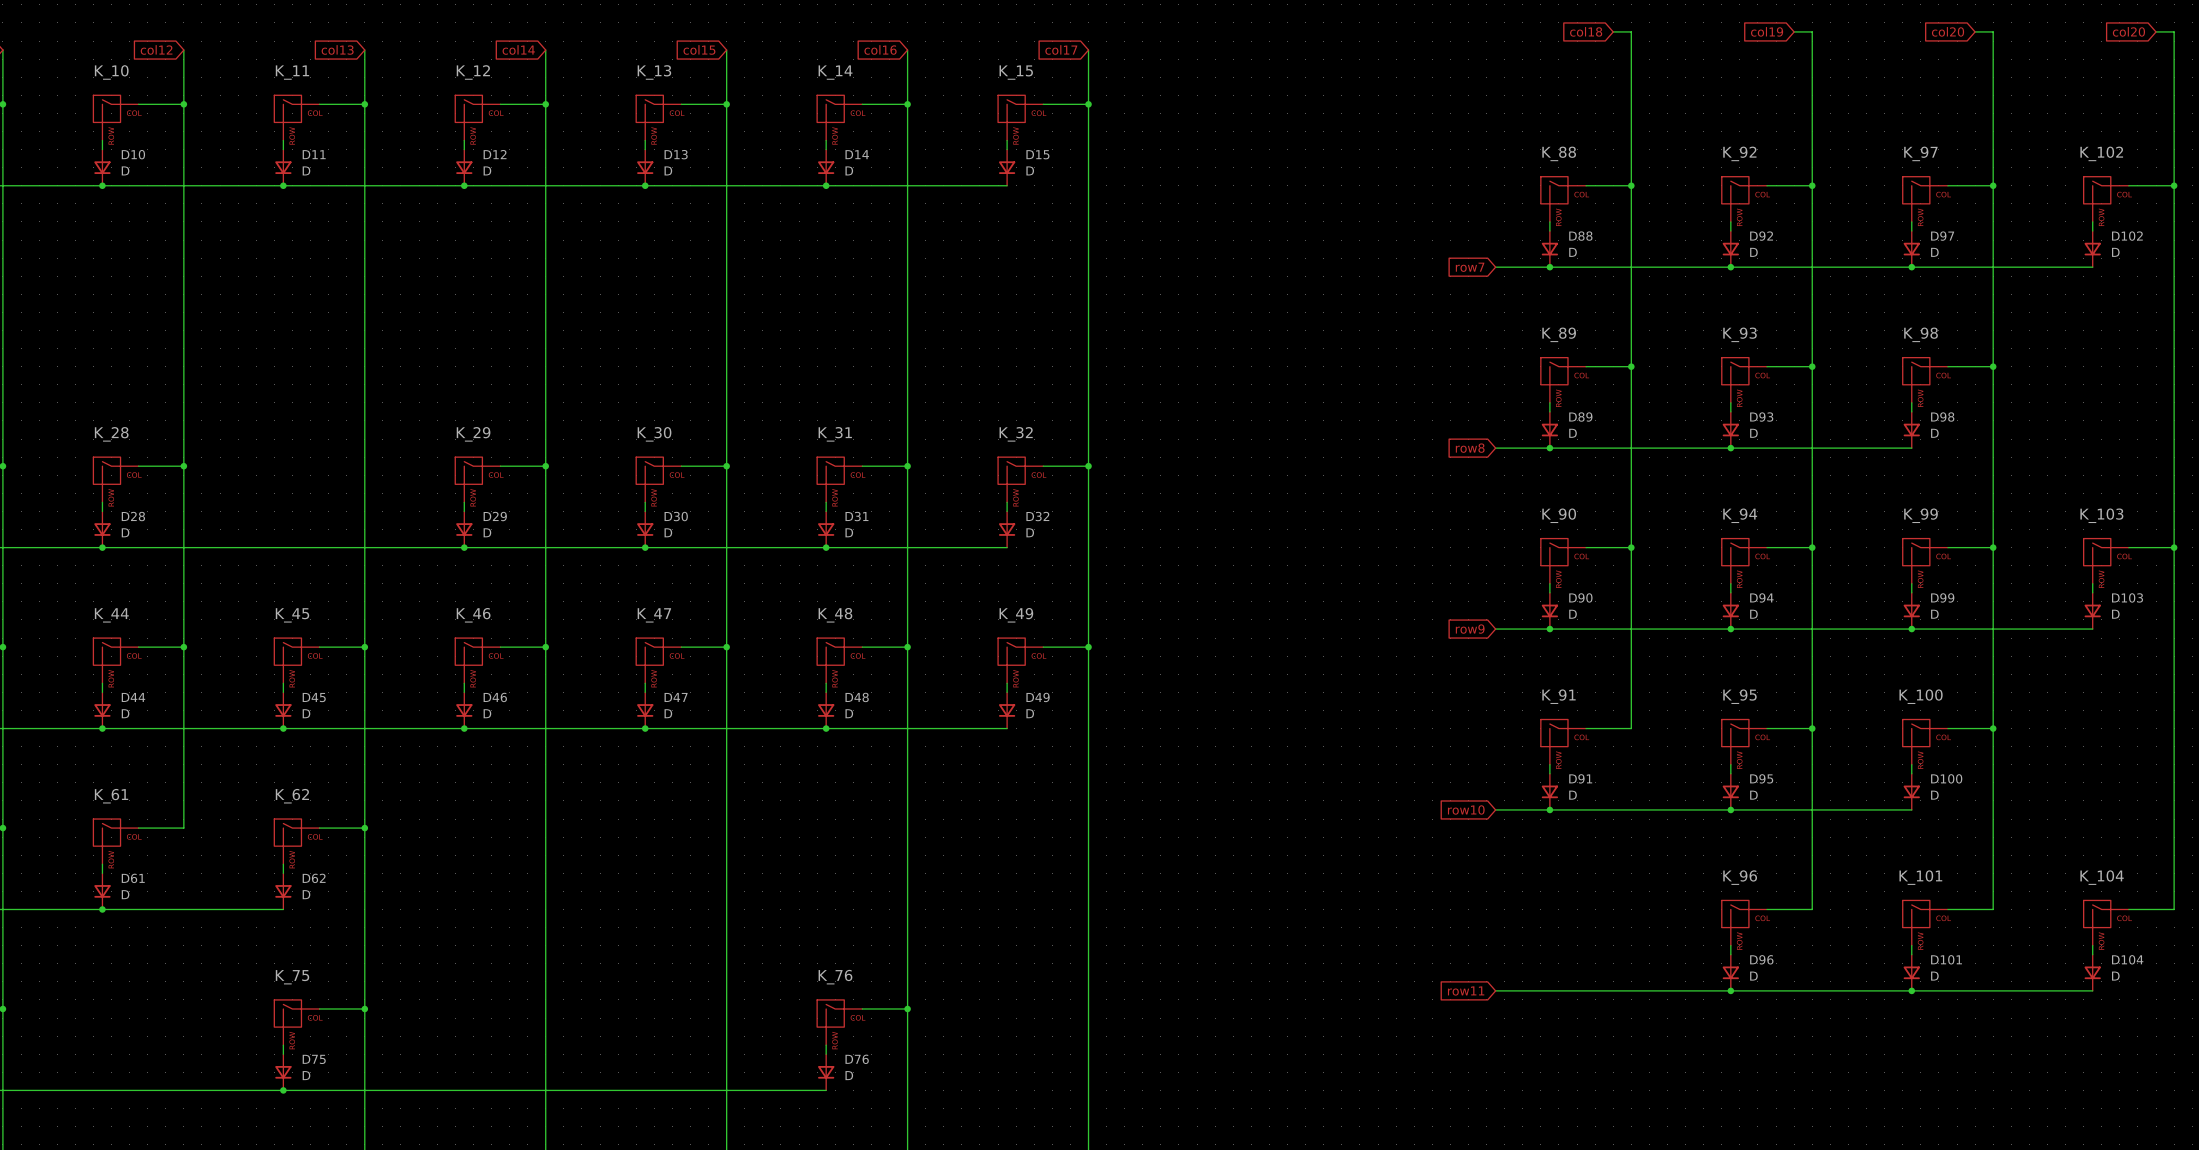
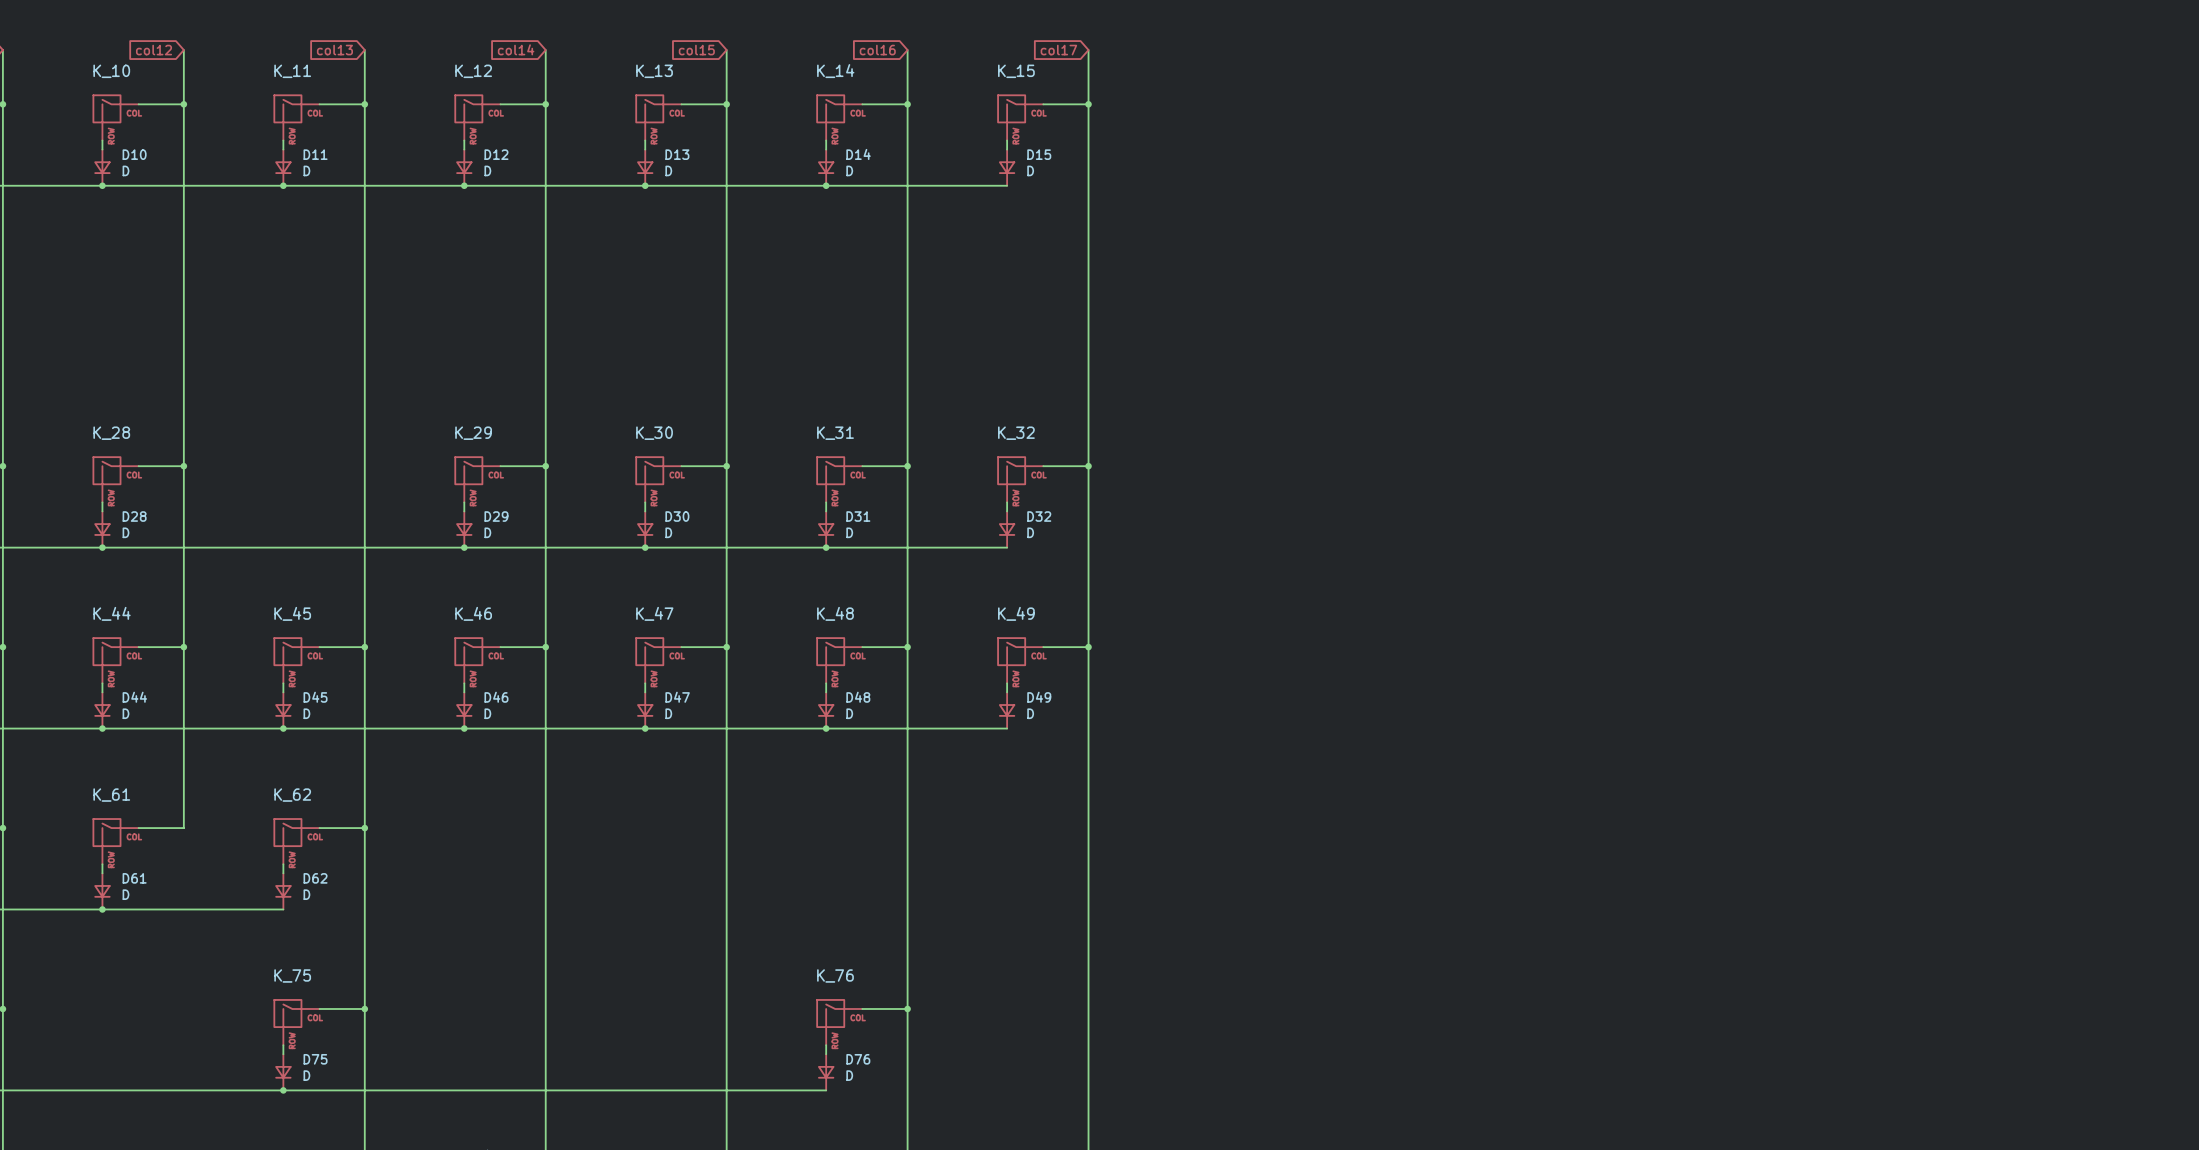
global label: col18 (1586, 31) -> none
wire: (1613, 31) (1631, 31) (1631, 728) (1586, 728) -> none
global label: col19 (1767, 31) -> none
wire: (1794, 31) (1812, 31) (1812, 909) (1767, 909) -> none
global label: col20 (1948, 31) -> none
wire: (1975, 31) (1993, 31) (1993, 909) (1947, 909) -> none
global label: col20 (2128, 31) -> none
wire: (2156, 31) (2174, 31) (2174, 909) (2128, 909) -> none
wire: (1586, 185) (1631, 185) -> none
junction: (1631, 185) -> none
wire: (1767, 185) (1812, 185) -> none
junction: (1812, 185) -> none
wire: (1947, 185) (1993, 185) -> none
junction: (1993, 185) -> none
wire: (2128, 185) (2174, 185) -> none
junction: (2174, 185) -> none
K_88: (1563, 199) -> none
K_92: (1744, 199) -> none
K_97: (1925, 199) -> none
K_102: (2106, 199) -> none
wire: (1549, 221) (1549, 230) -> none
wire: (1730, 221) (1730, 230) -> none
wire: (1911, 221) (1911, 230) -> none
wire: (2092, 221) (2092, 230) -> none
D88: D (1549, 249) -> none
D92: D (1730, 249) -> none
D97: D (1911, 249) -> none
D102: D (2092, 249) -> none
global label: row7 (1470, 267) -> none
wire: (1495, 267) (2092, 267) -> none
junction: (1549, 267) -> none
junction: (1730, 267) -> none
junction: (1911, 267) -> none
wire: (1586, 366) (1631, 366) -> none
junction: (1631, 366) -> none
wire: (1767, 366) (1812, 366) -> none
junction: (1812, 366) -> none
wire: (1947, 366) (1993, 366) -> none
junction: (1993, 366) -> none
K_89: (1563, 380) -> none
K_93: (1744, 380) -> none
K_98: (1925, 380) -> none
wire: (1549, 402) (1549, 411) -> none
wire: (1730, 402) (1730, 411) -> none
wire: (1911, 402) (1911, 411) -> none
D89: D (1549, 430) -> none
D93: D (1730, 430) -> none
D98: D (1911, 430) -> none
global label: row8 (1470, 448) -> none
wire: (1495, 448) (1911, 448) -> none
junction: (1549, 448) -> none
junction: (1730, 448) -> none
wire: (1586, 547) (1631, 547) -> none
junction: (1631, 547) -> none
wire: (1767, 547) (1812, 547) -> none
junction: (1812, 547) -> none
wire: (1947, 547) (1993, 547) -> none
junction: (1993, 547) -> none
wire: (2128, 547) (2174, 547) -> none
junction: (2174, 547) -> none
K_90: (1563, 561) -> none
K_94: (1744, 561) -> none
K_99: (1925, 561) -> none
K_103: (2106, 561) -> none
wire: (1549, 583) (1549, 592) -> none
wire: (1730, 583) (1730, 592) -> none
wire: (1911, 583) (1911, 592) -> none
wire: (2092, 583) (2092, 592) -> none
D90: D (1549, 610) -> none
D94: D (1730, 610) -> none
D99: D (1911, 610) -> none
D103: D (2092, 610) -> none
global label: row9 (1470, 629) -> none
wire: (1495, 629) (2092, 629) -> none
junction: (1549, 629) -> none
junction: (1730, 629) -> none
junction: (1911, 629) -> none
wire: (1767, 728) (1812, 728) -> none
junction: (1812, 728) -> none
wire: (1947, 728) (1993, 728) -> none
junction: (1993, 728) -> none
K_91: (1563, 742) -> none
K_95: (1744, 742) -> none
K_100: (1925, 742) -> none
wire: (1549, 764) (1549, 773) -> none
wire: (1730, 764) (1730, 773) -> none
wire: (1911, 764) (1911, 773) -> none
D91: D (1549, 791) -> none
D95: D (1730, 791) -> none
D100: D (1911, 791) -> none
global label: row10 (1466, 809) -> none
wire: (1495, 809) (1911, 809) -> none
junction: (1549, 809) -> none
junction: (1730, 809) -> none
K_96: (1744, 923) -> none
K_101: (1925, 923) -> none
K_104: (2106, 923) -> none
wire: (1730, 945) (1730, 954) -> none
wire: (1911, 945) (1911, 954) -> none
wire: (2092, 945) (2092, 954) -> none
D96: D (1730, 972) -> none
D101: D (1911, 972) -> none
D104: D (2092, 972) -> none
global label: row11 (1466, 990) -> none
wire: (1495, 990) (2092, 990) -> none
junction: (1730, 990) -> none
junction: (1911, 990) -> none

